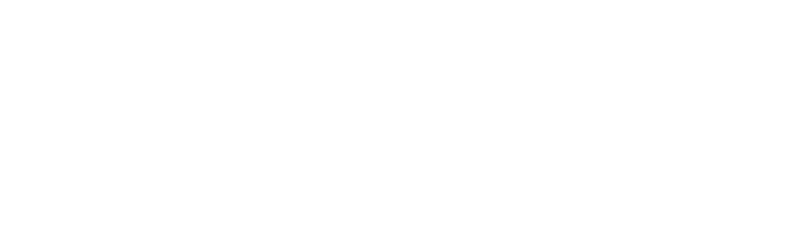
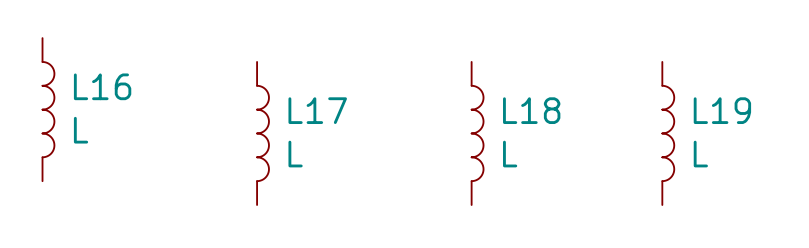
L16: none -> L (48, 109)
L17: none -> L (263, 133)
L18: none -> L (477, 133)
L19: none -> L (668, 133)

